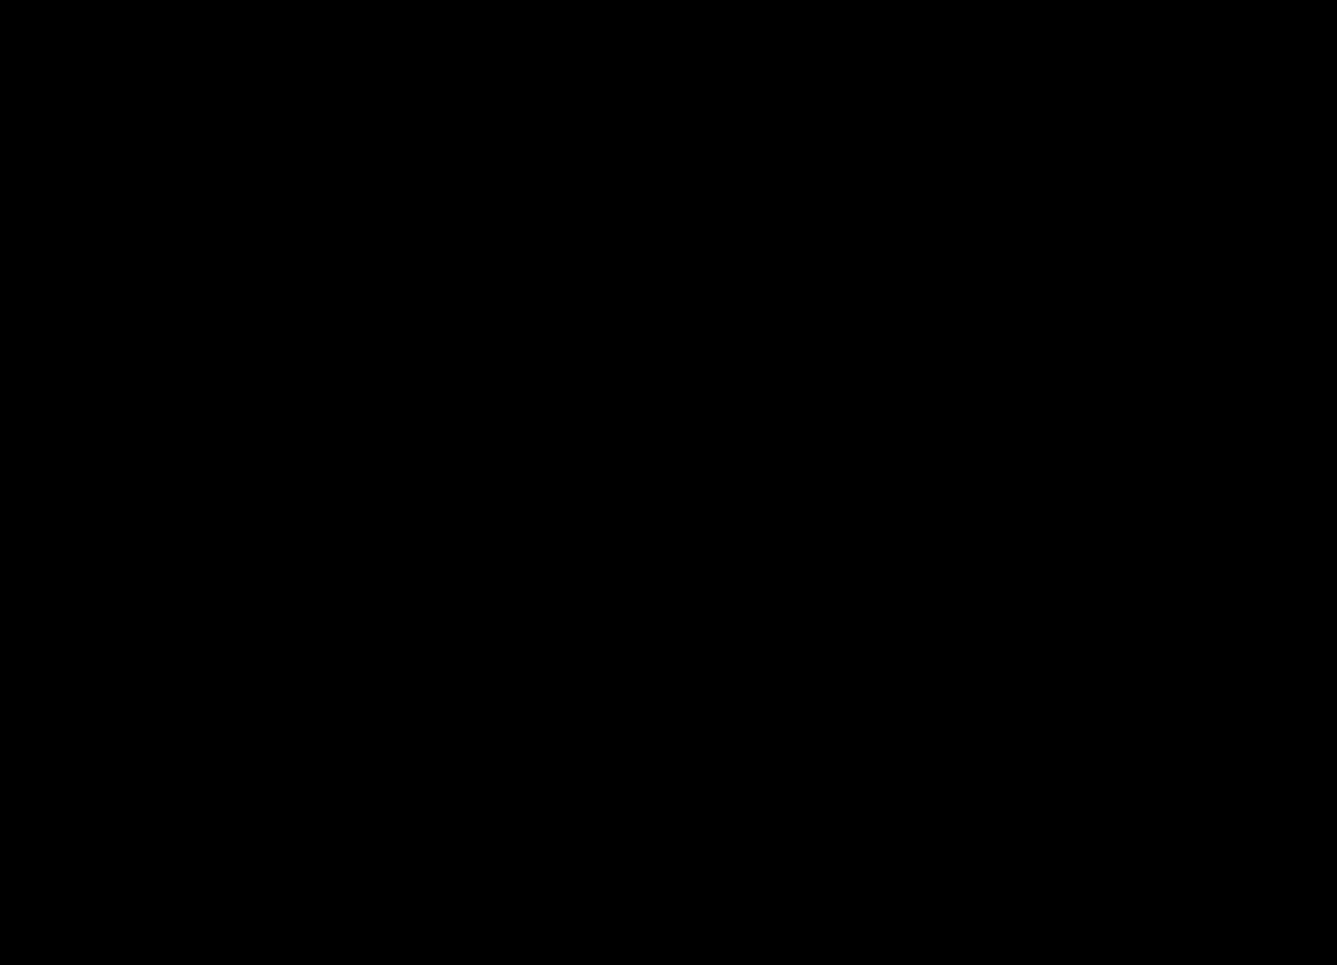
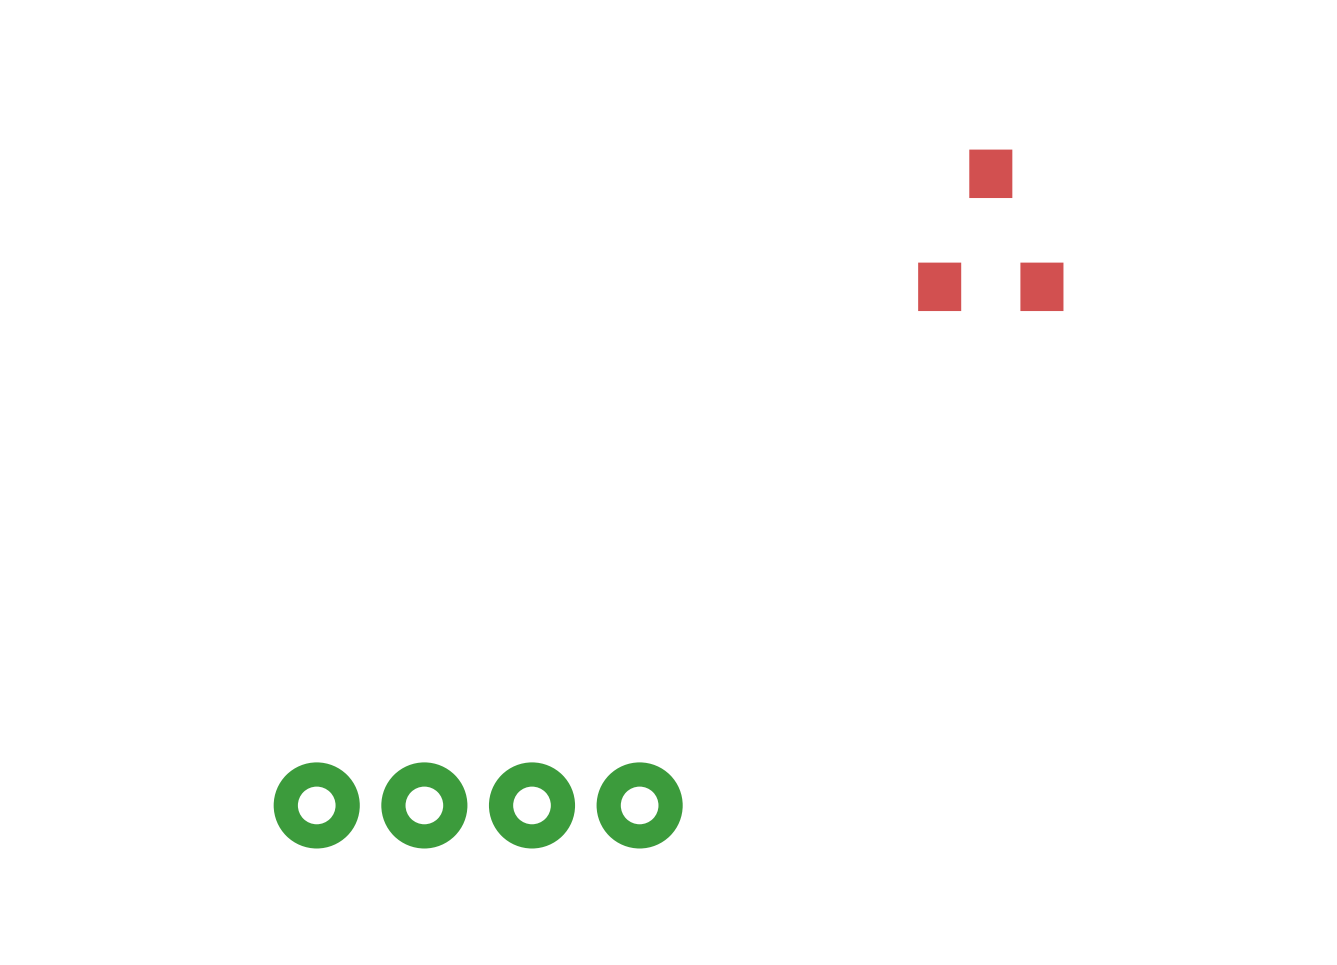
part: none -> (990, 230)
part: none -> (478, 805)

